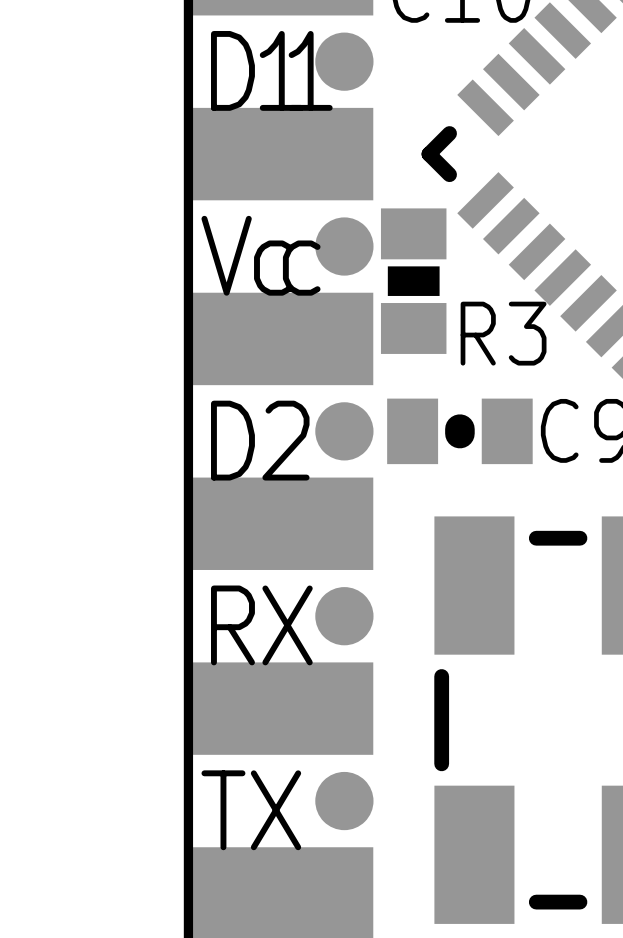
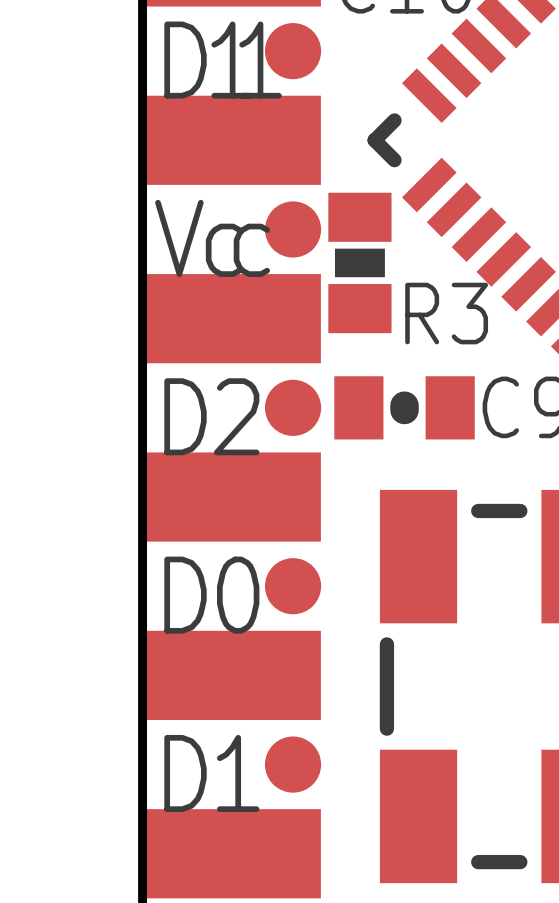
text: R (232, 625) -> D (185, 595)
text: X (287, 625) -> 0 (238, 595)
text: T (223, 810) -> D (185, 773)
text: X (276, 810) -> 1 (238, 773)

